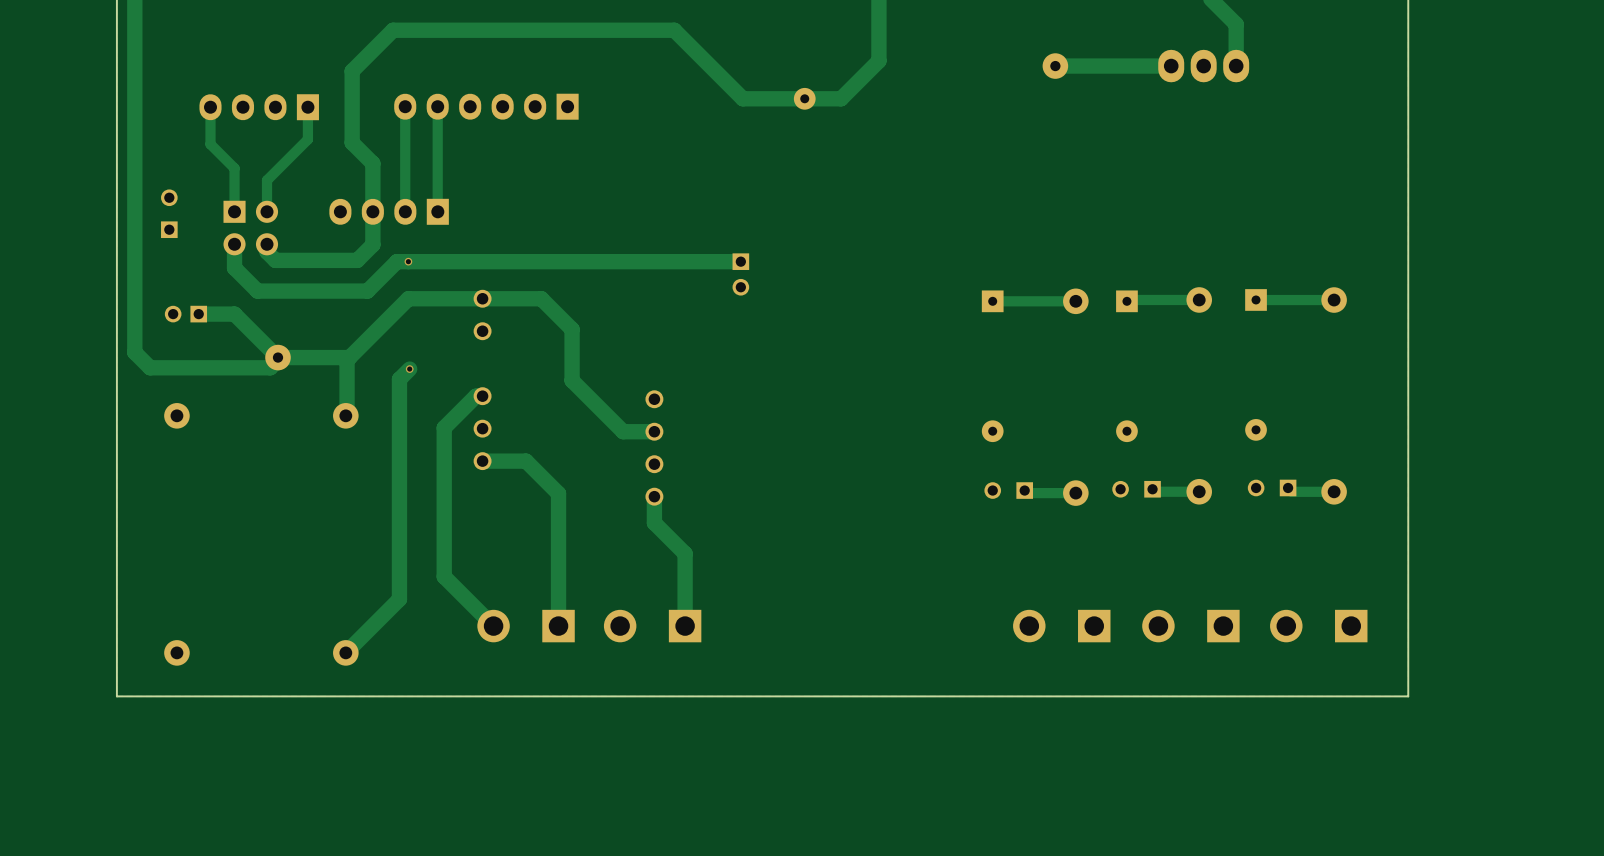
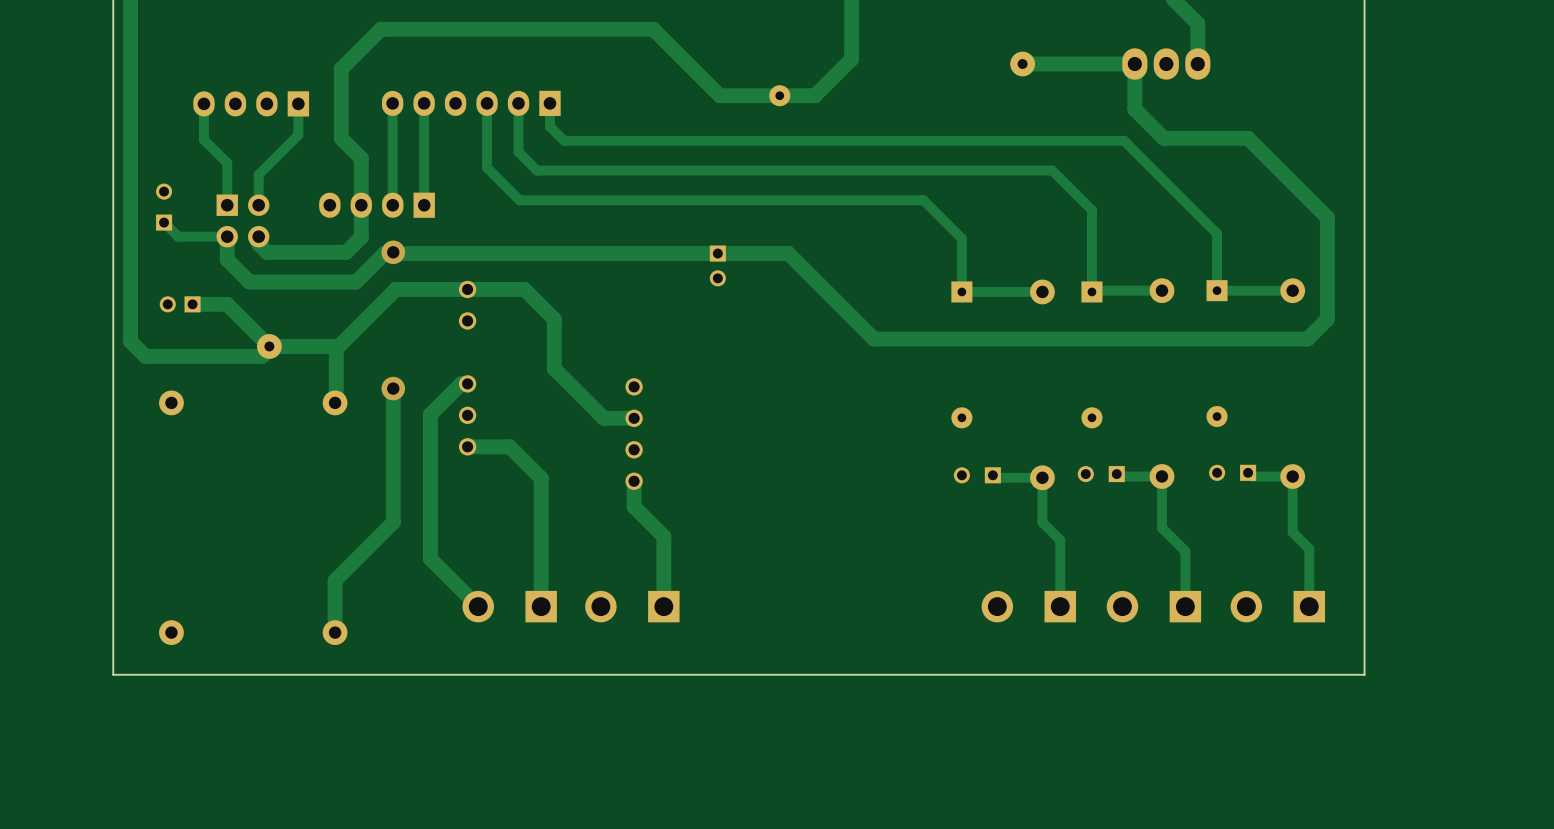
track: none -> (1134, 64) (1134, 109) (1163, 138) (1248, 138) (1327, 217) (1327, 319) (1307, 339) (873, 339) (788, 253) (717, 253)
track: none -> (487, 103) (487, 167) (519, 200) (923, 200) (961, 238) (961, 291)
track: none -> (518, 103) (518, 152) (536, 170) (1052, 170) (1091, 210) (1091, 291)
track: none -> (549, 103) (549, 126) (564, 140) (1124, 140) (1217, 233) (1217, 290)
track: none -> (164, 222) (178, 236) (227, 236)
via size: [404, 257, 413, 266] -> [381, 240, 406, 265]
track: (409, 369) (399, 379) (399, 599) (345, 652) -> (393, 388) (393, 522) (335, 580) (335, 632)
via: (409, 369) -> none
via: none -> (393, 388)
track: none -> (1161, 476) (1161, 527) (1185, 551) (1185, 606)
track: none -> (1292, 476) (1292, 532) (1309, 548) (1309, 606)
track: none -> (1042, 477) (1042, 522) (1060, 540) (1060, 606)

